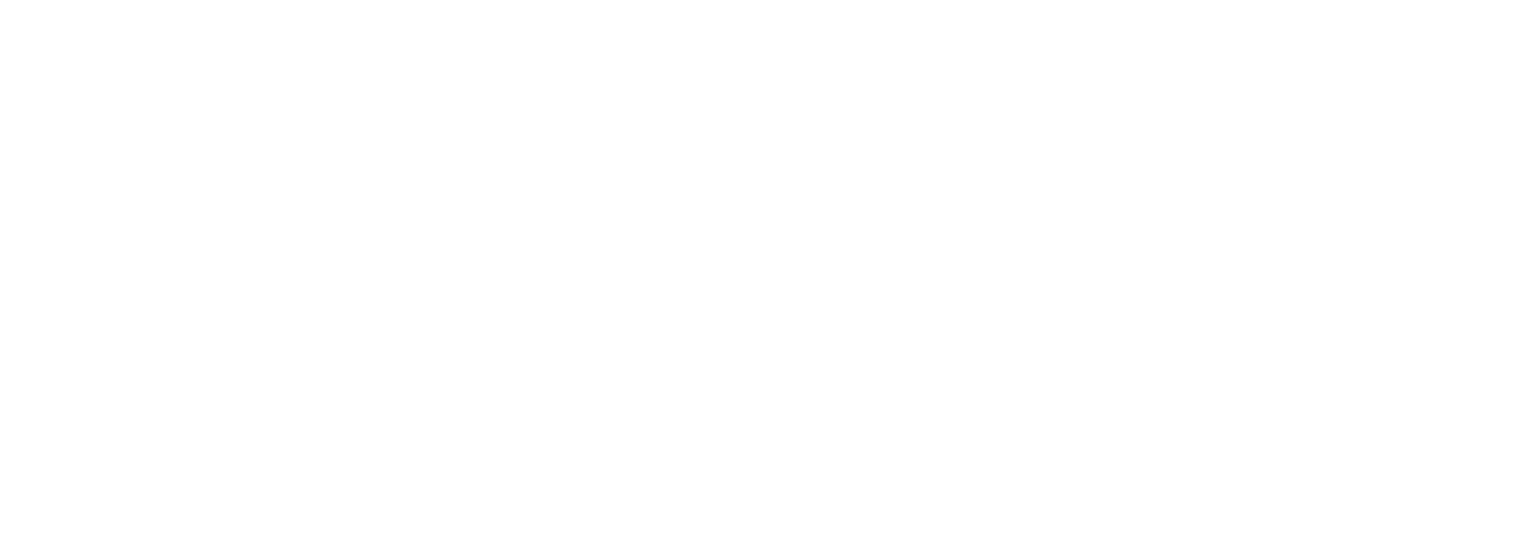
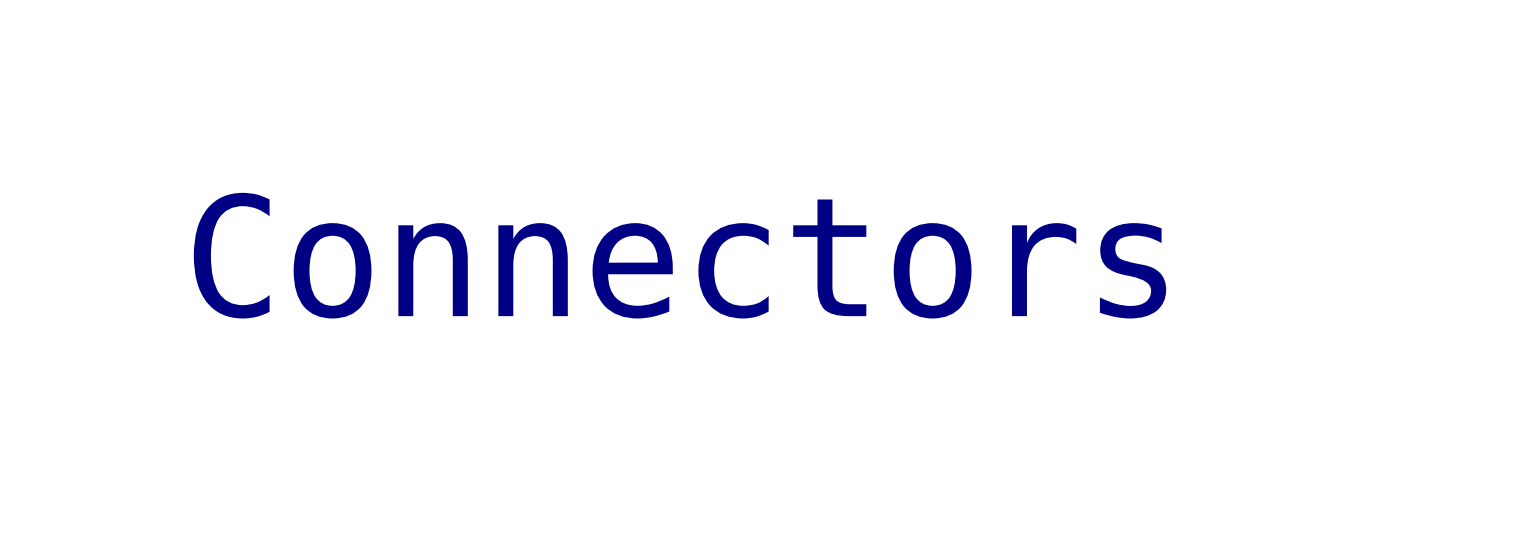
text: none -> Connectors (679, 255)

